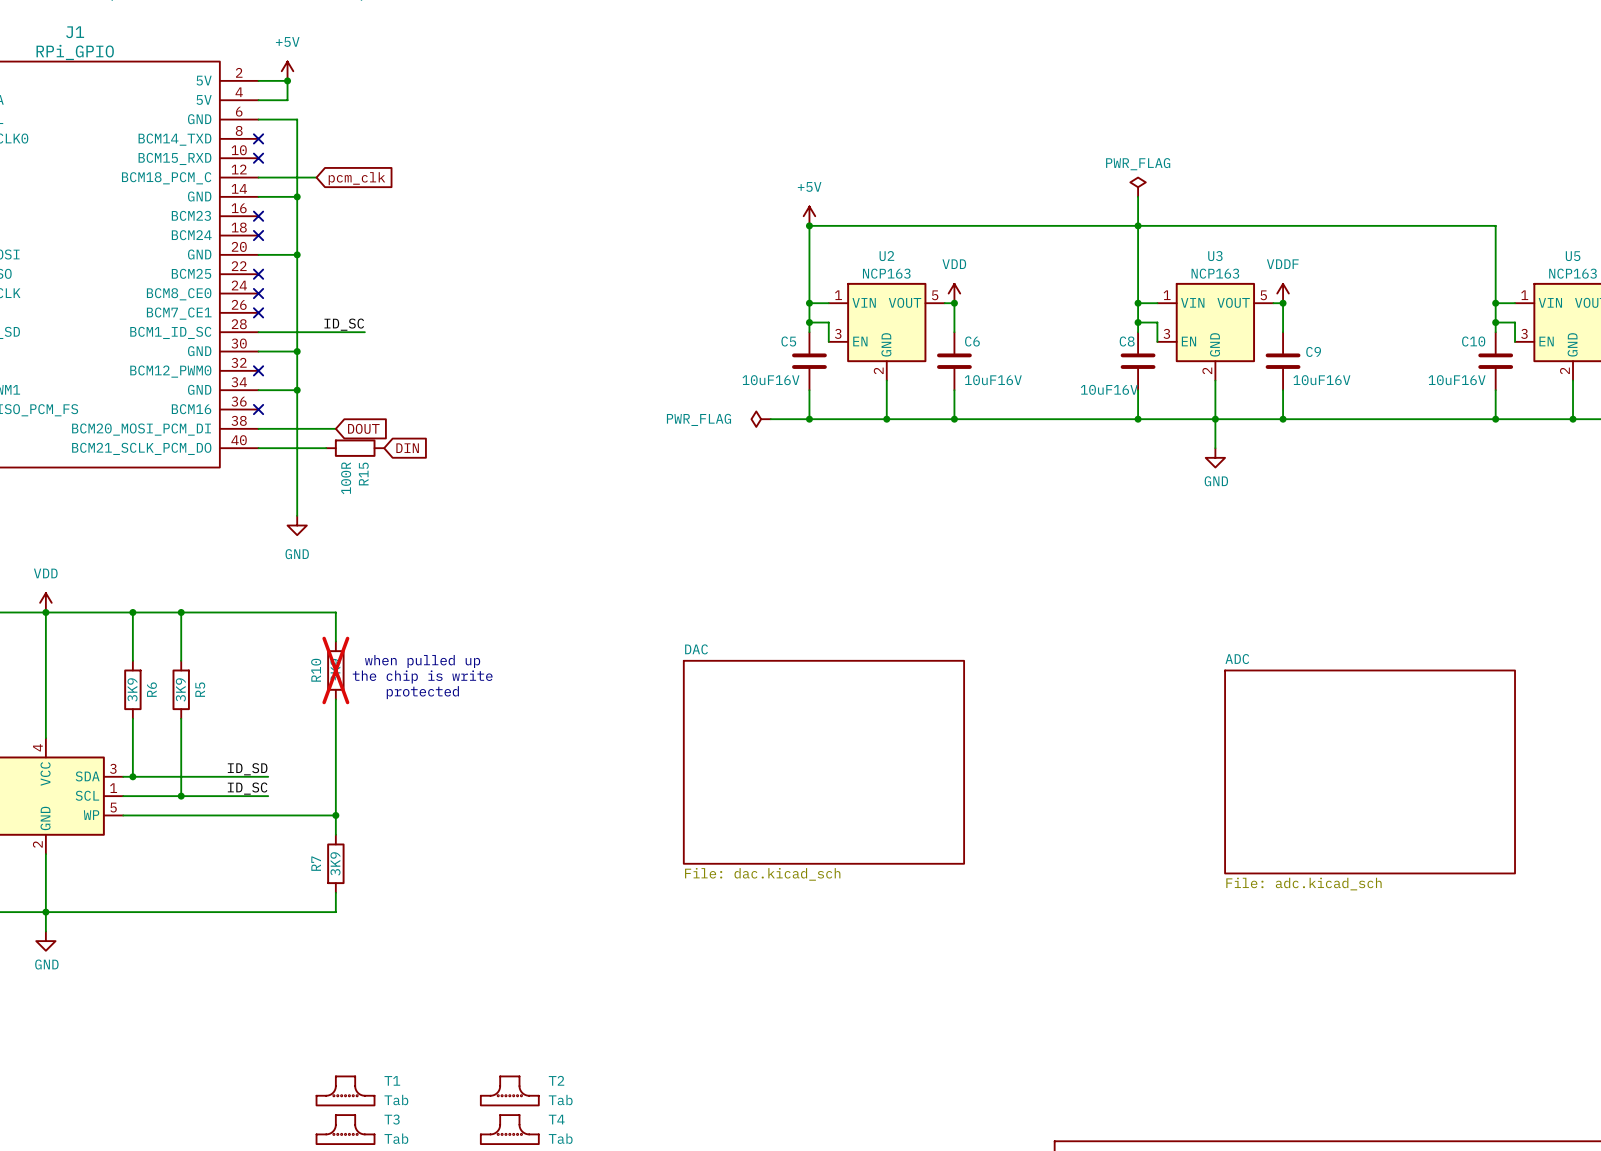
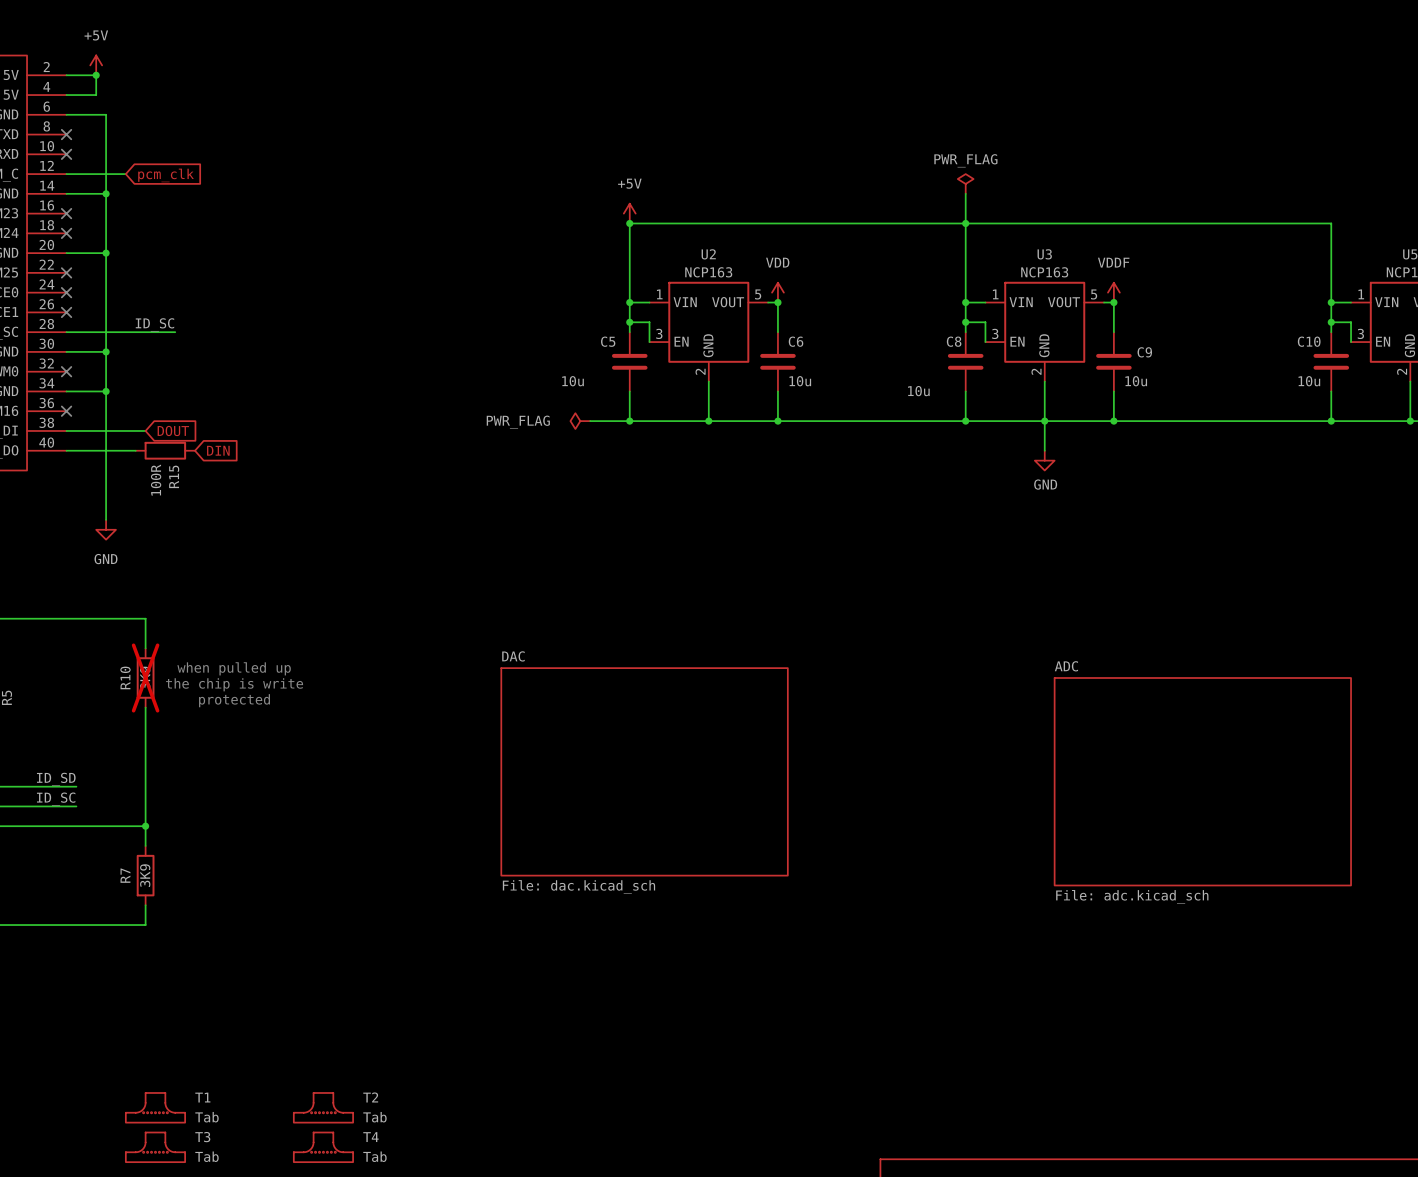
C5 value: 10uF16V (770, 380) -> 10u (573, 381)
C6 value: 10uF16V (993, 380) -> 10u (800, 381)
C9 value: 10uF16V (1321, 380) -> 10u (1136, 381)
C10 value: 10uF16V (1457, 380) -> 10u (1309, 381)
C8 value: 10uF16V (1109, 389) -> 10u (918, 391)

